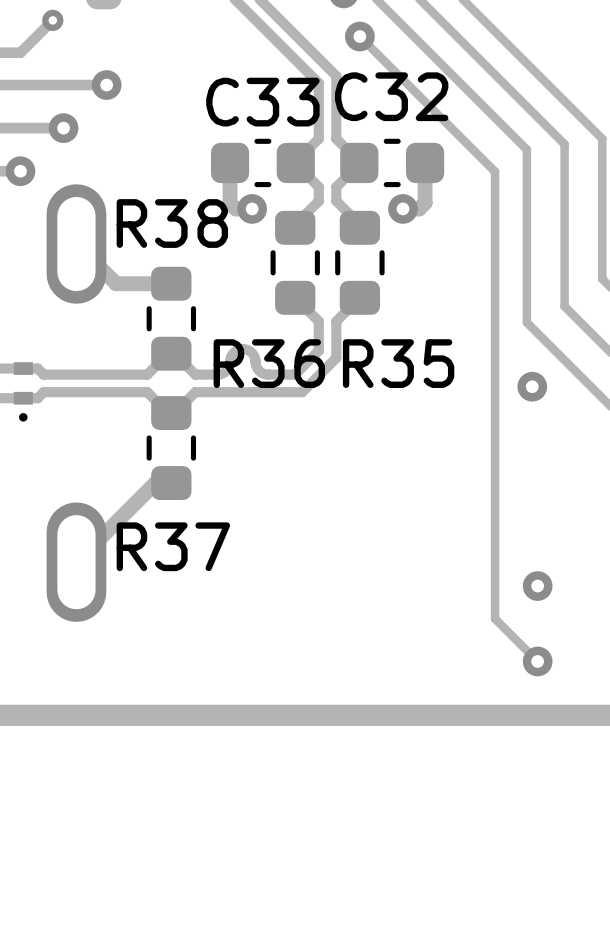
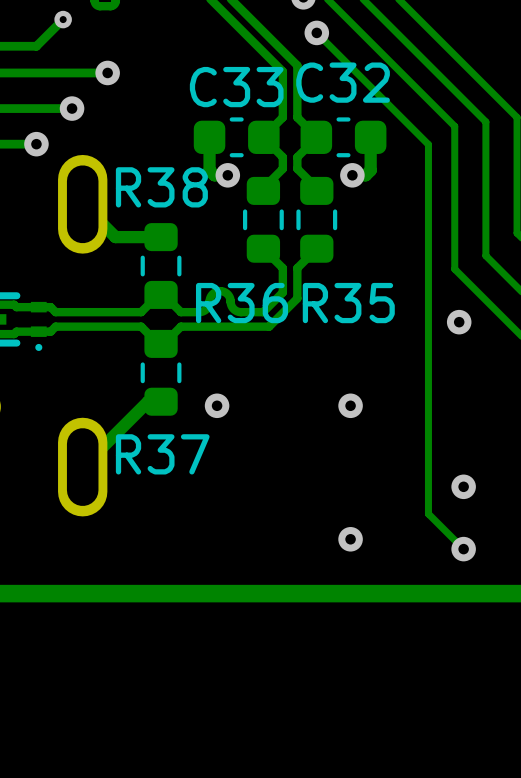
via: none -> (217, 405)
via: none -> (350, 405)
via: none -> (350, 539)

